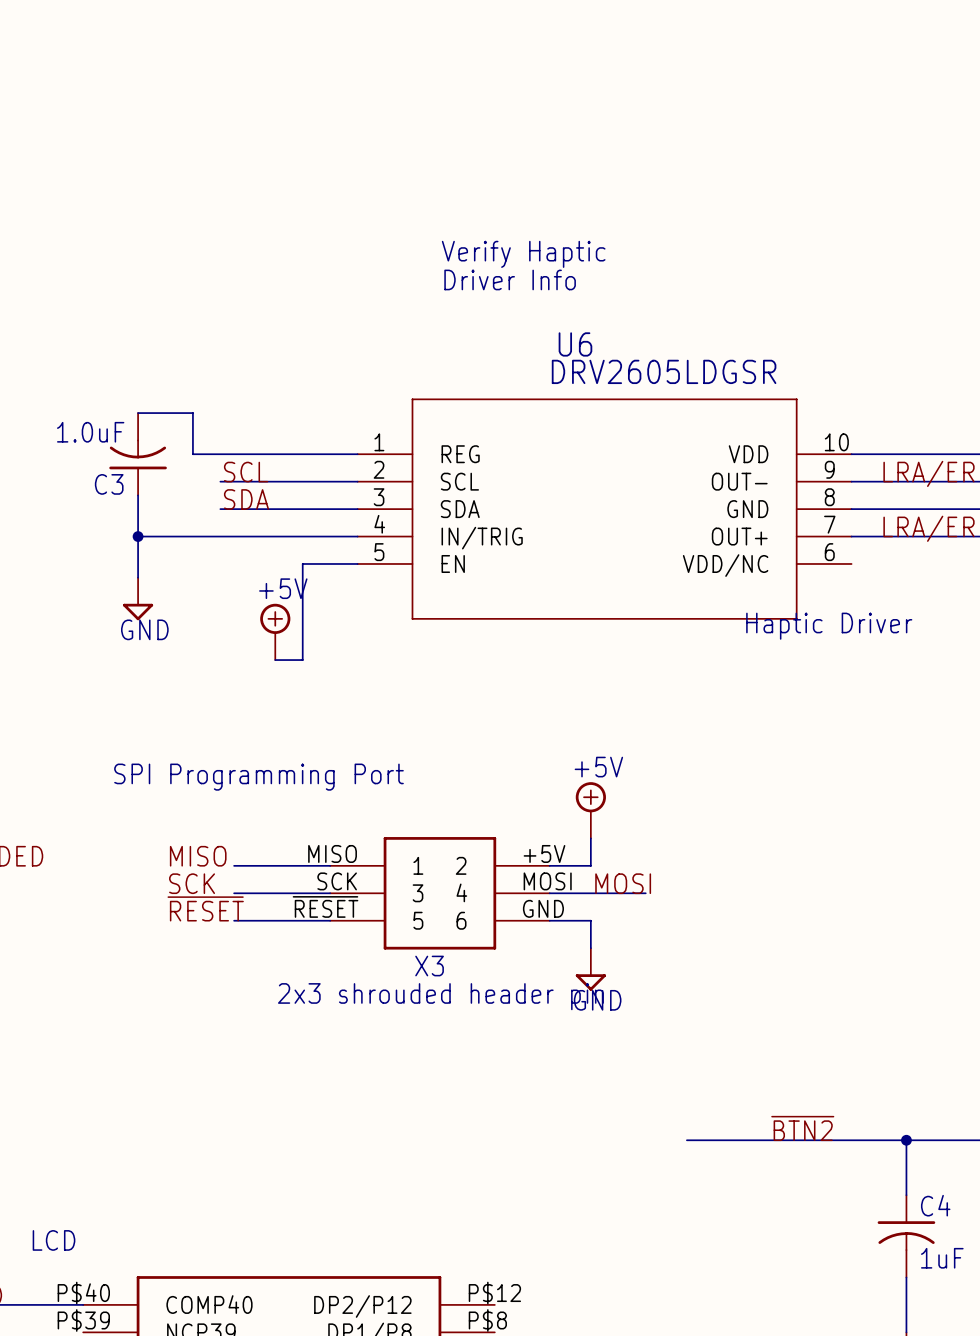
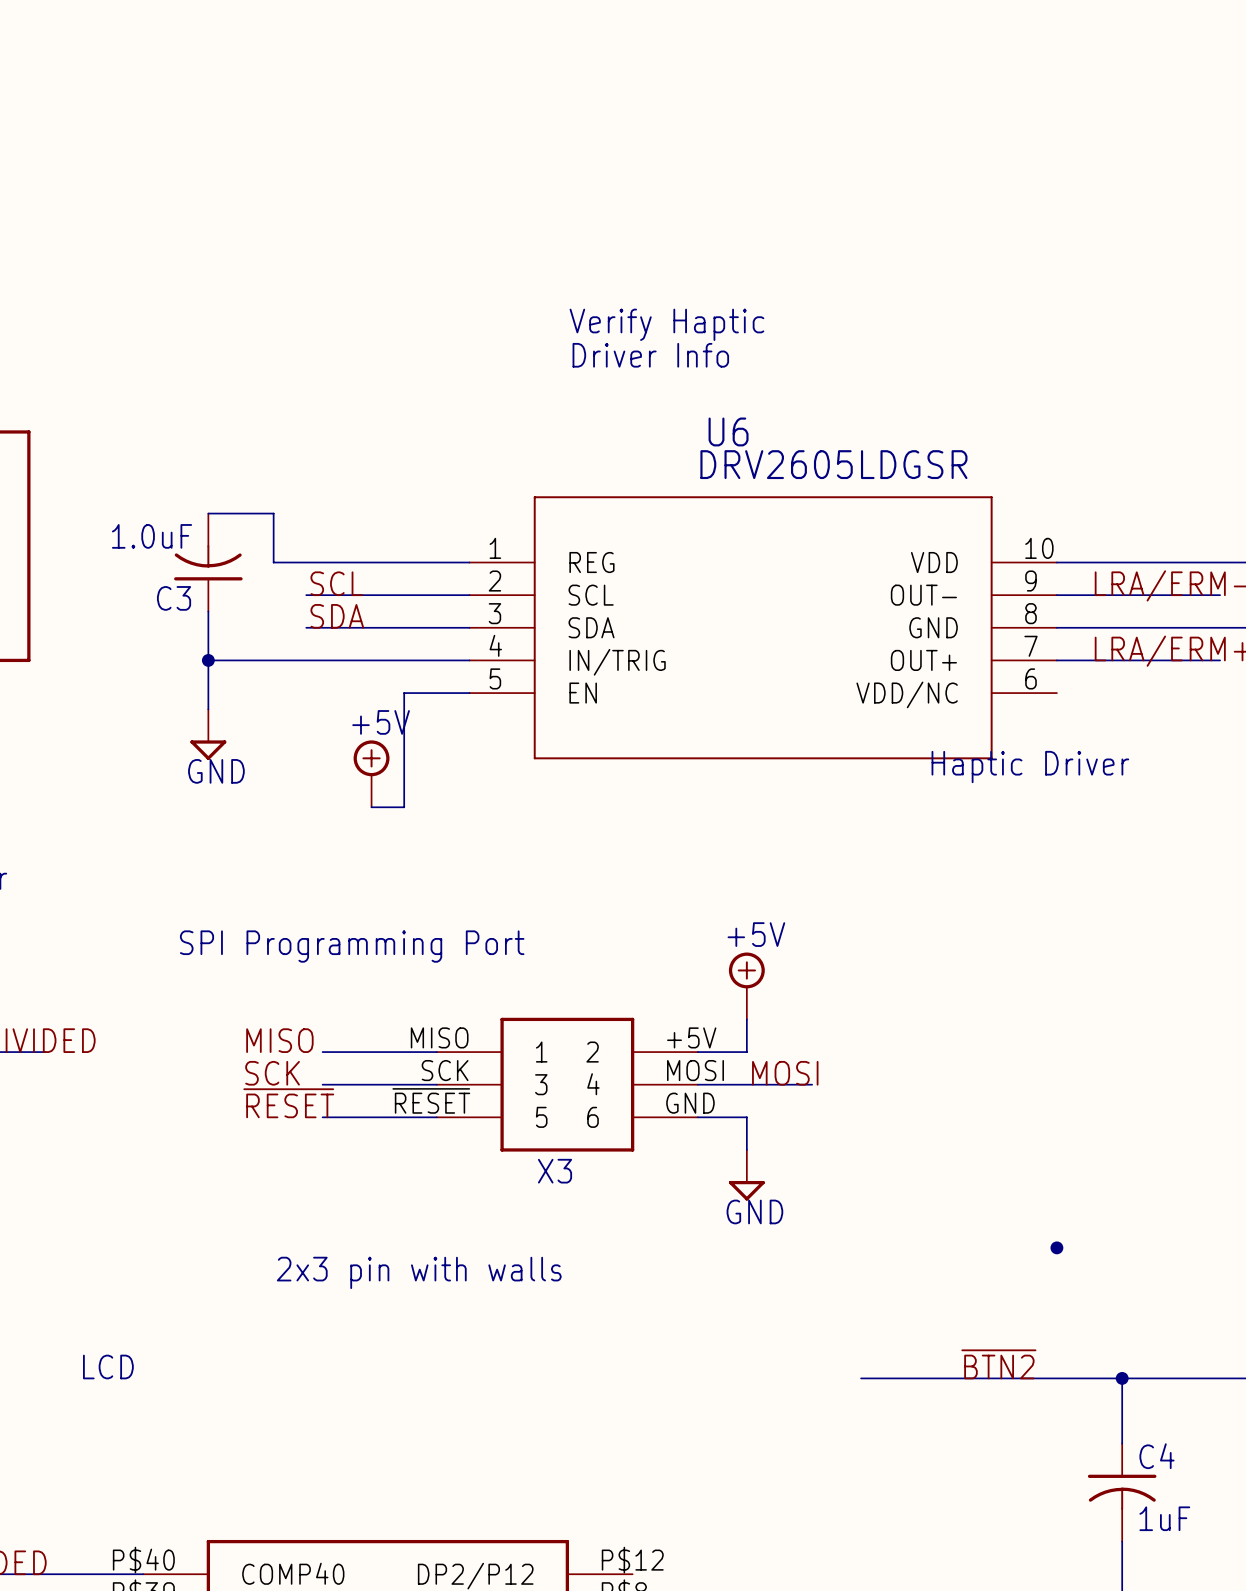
text: 2x3 shrouded header pin (440, 996) -> none
junction: none -> (1056, 1247)
text: none -> 2x3 pin with walls (419, 1272)
text position: LCD (54, 1240) -> LCD (108, 1366)

